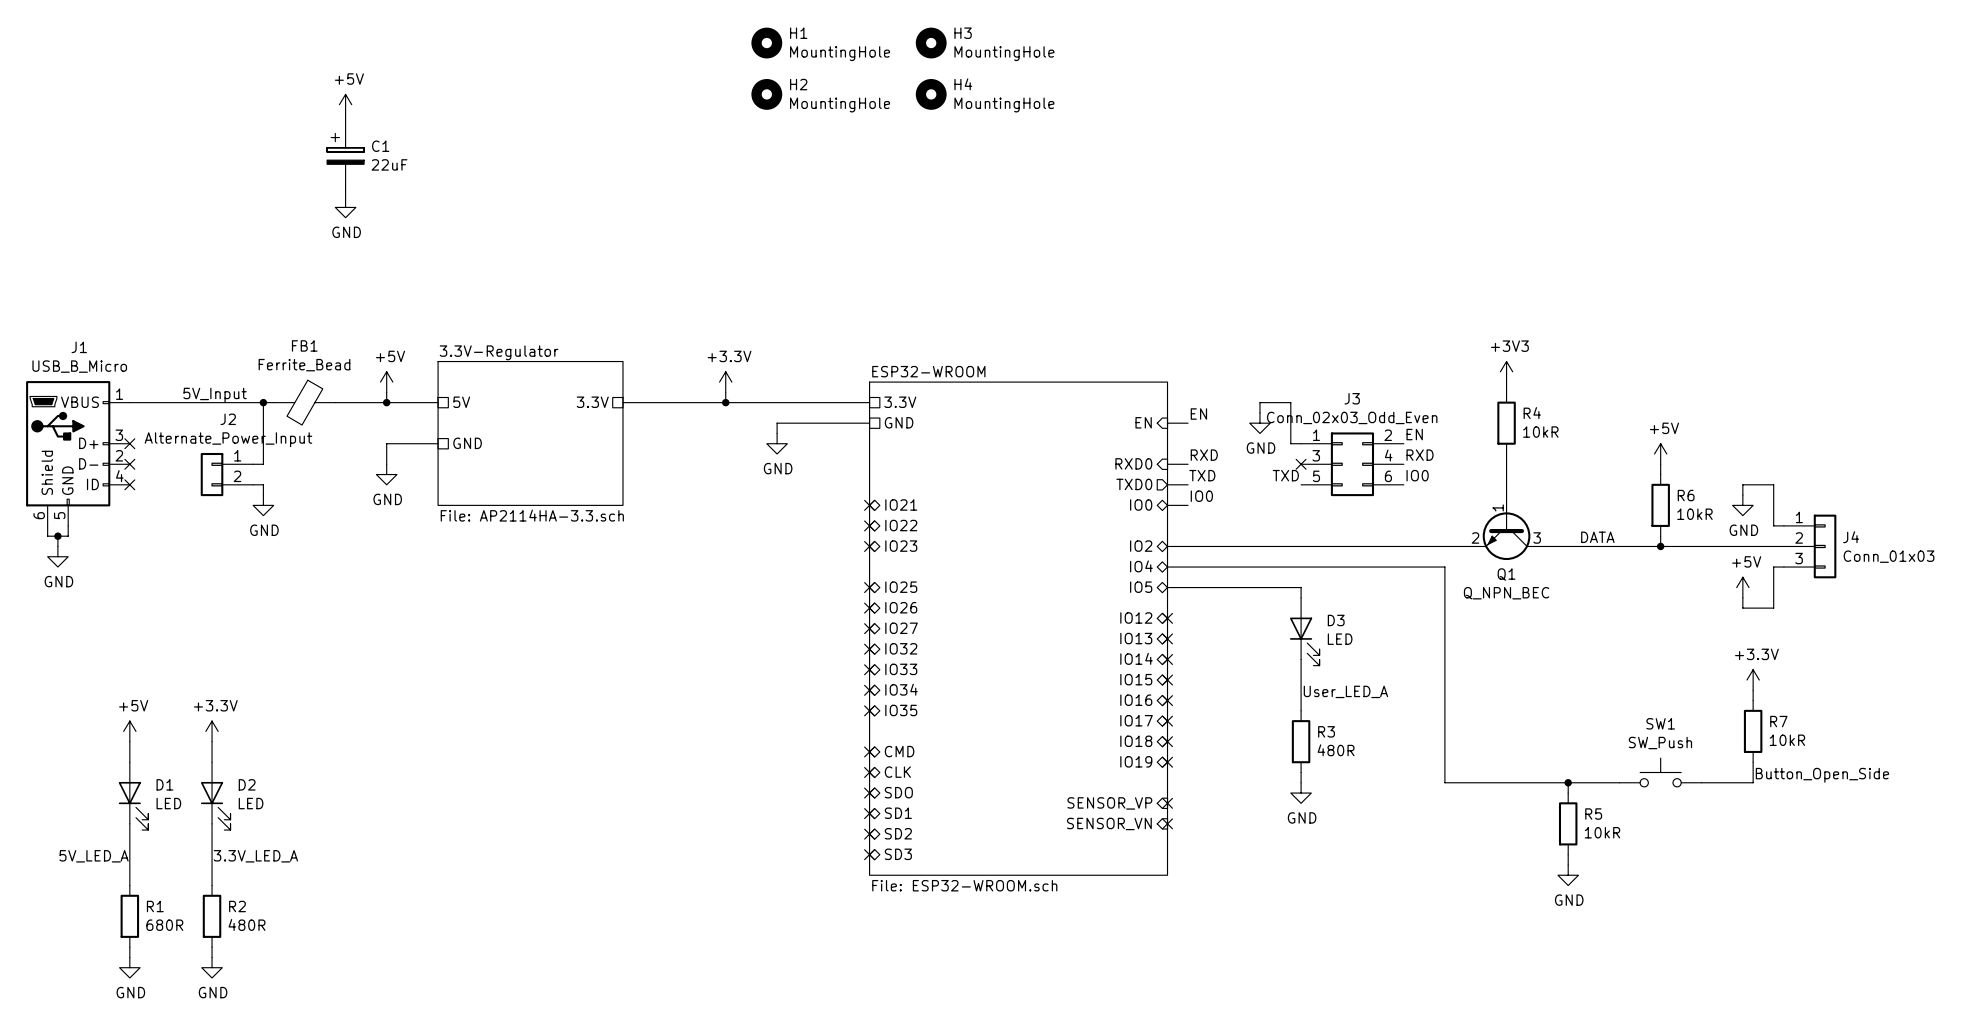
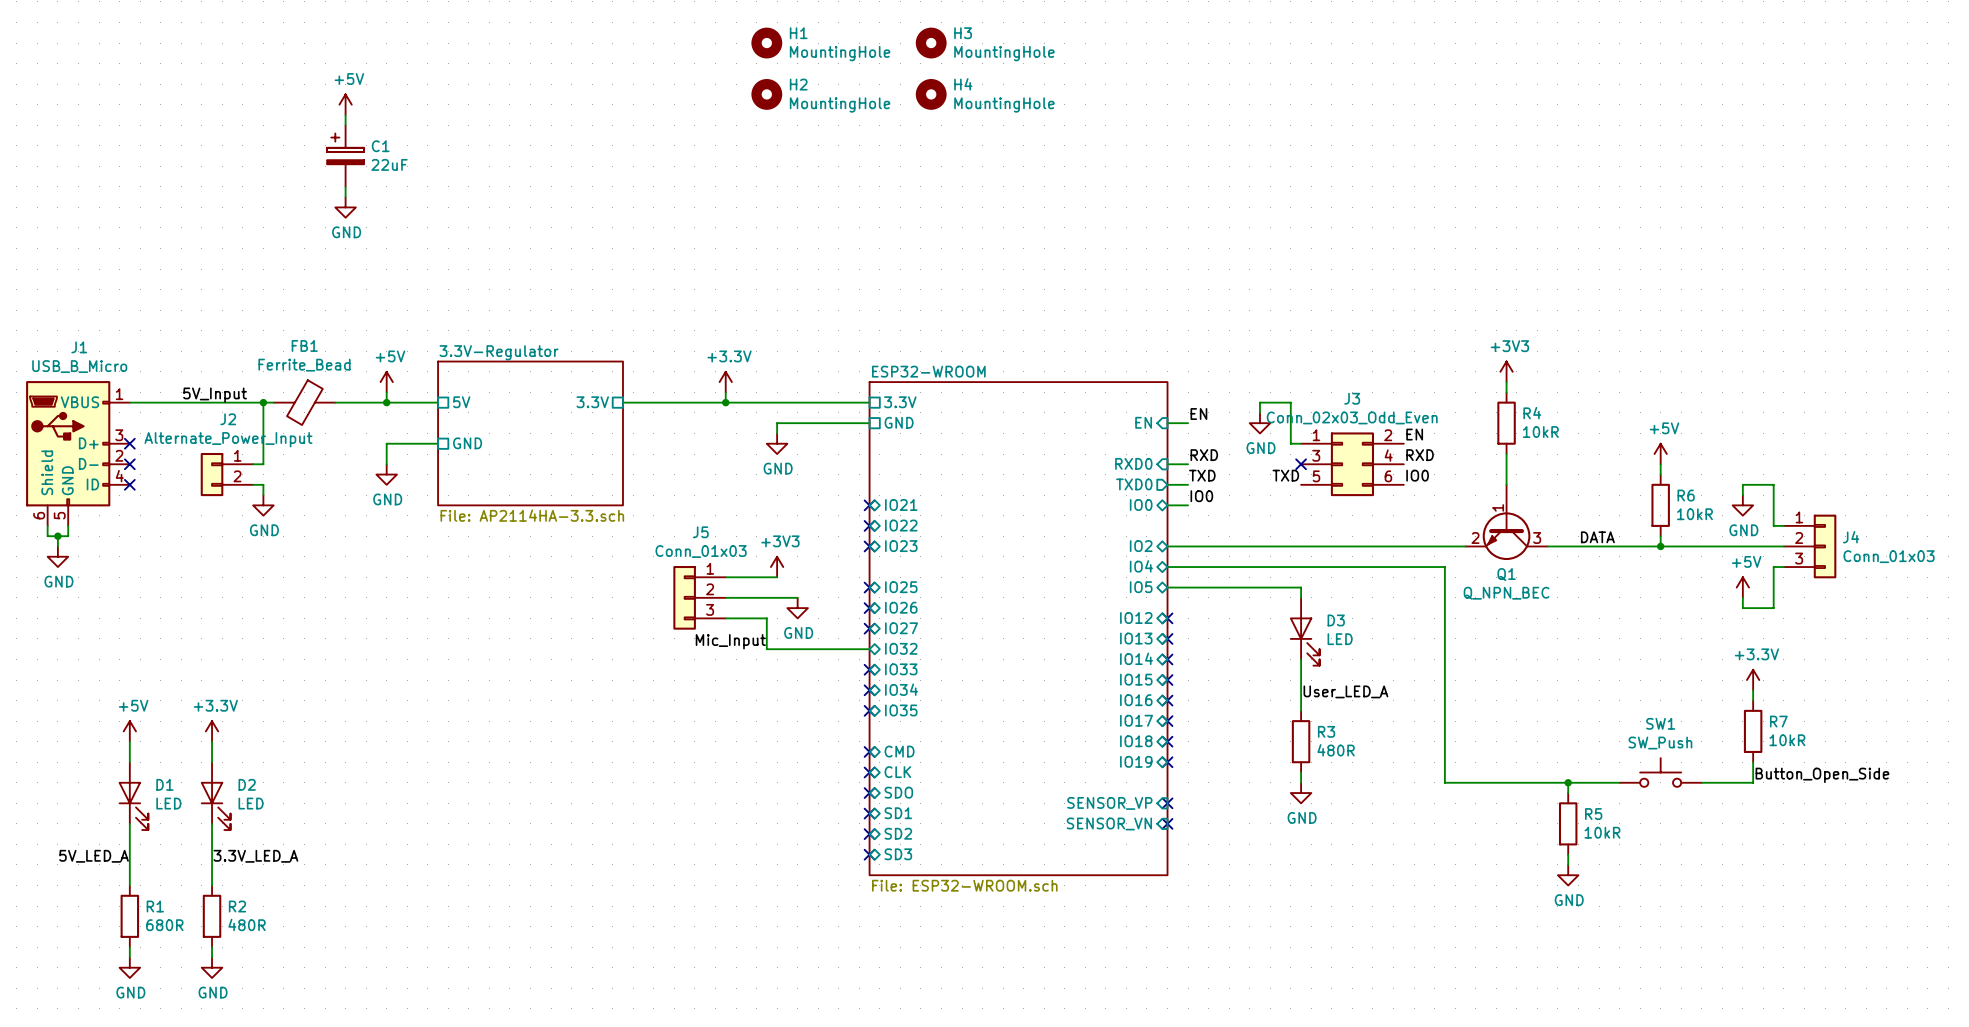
power symbol: none -> +3V3 (777, 567)
wire: none -> (725, 577) (777, 577)
J5: none -> Conn_01x03 (699, 597)
wire: none -> (725, 597) (797, 597)
power symbol: none -> GND (797, 608)
wire: none -> (725, 618) (766, 618) (766, 649) (869, 649)
label: none -> Mic_Input (730, 641)
no-connect mark: (869, 649) -> none

